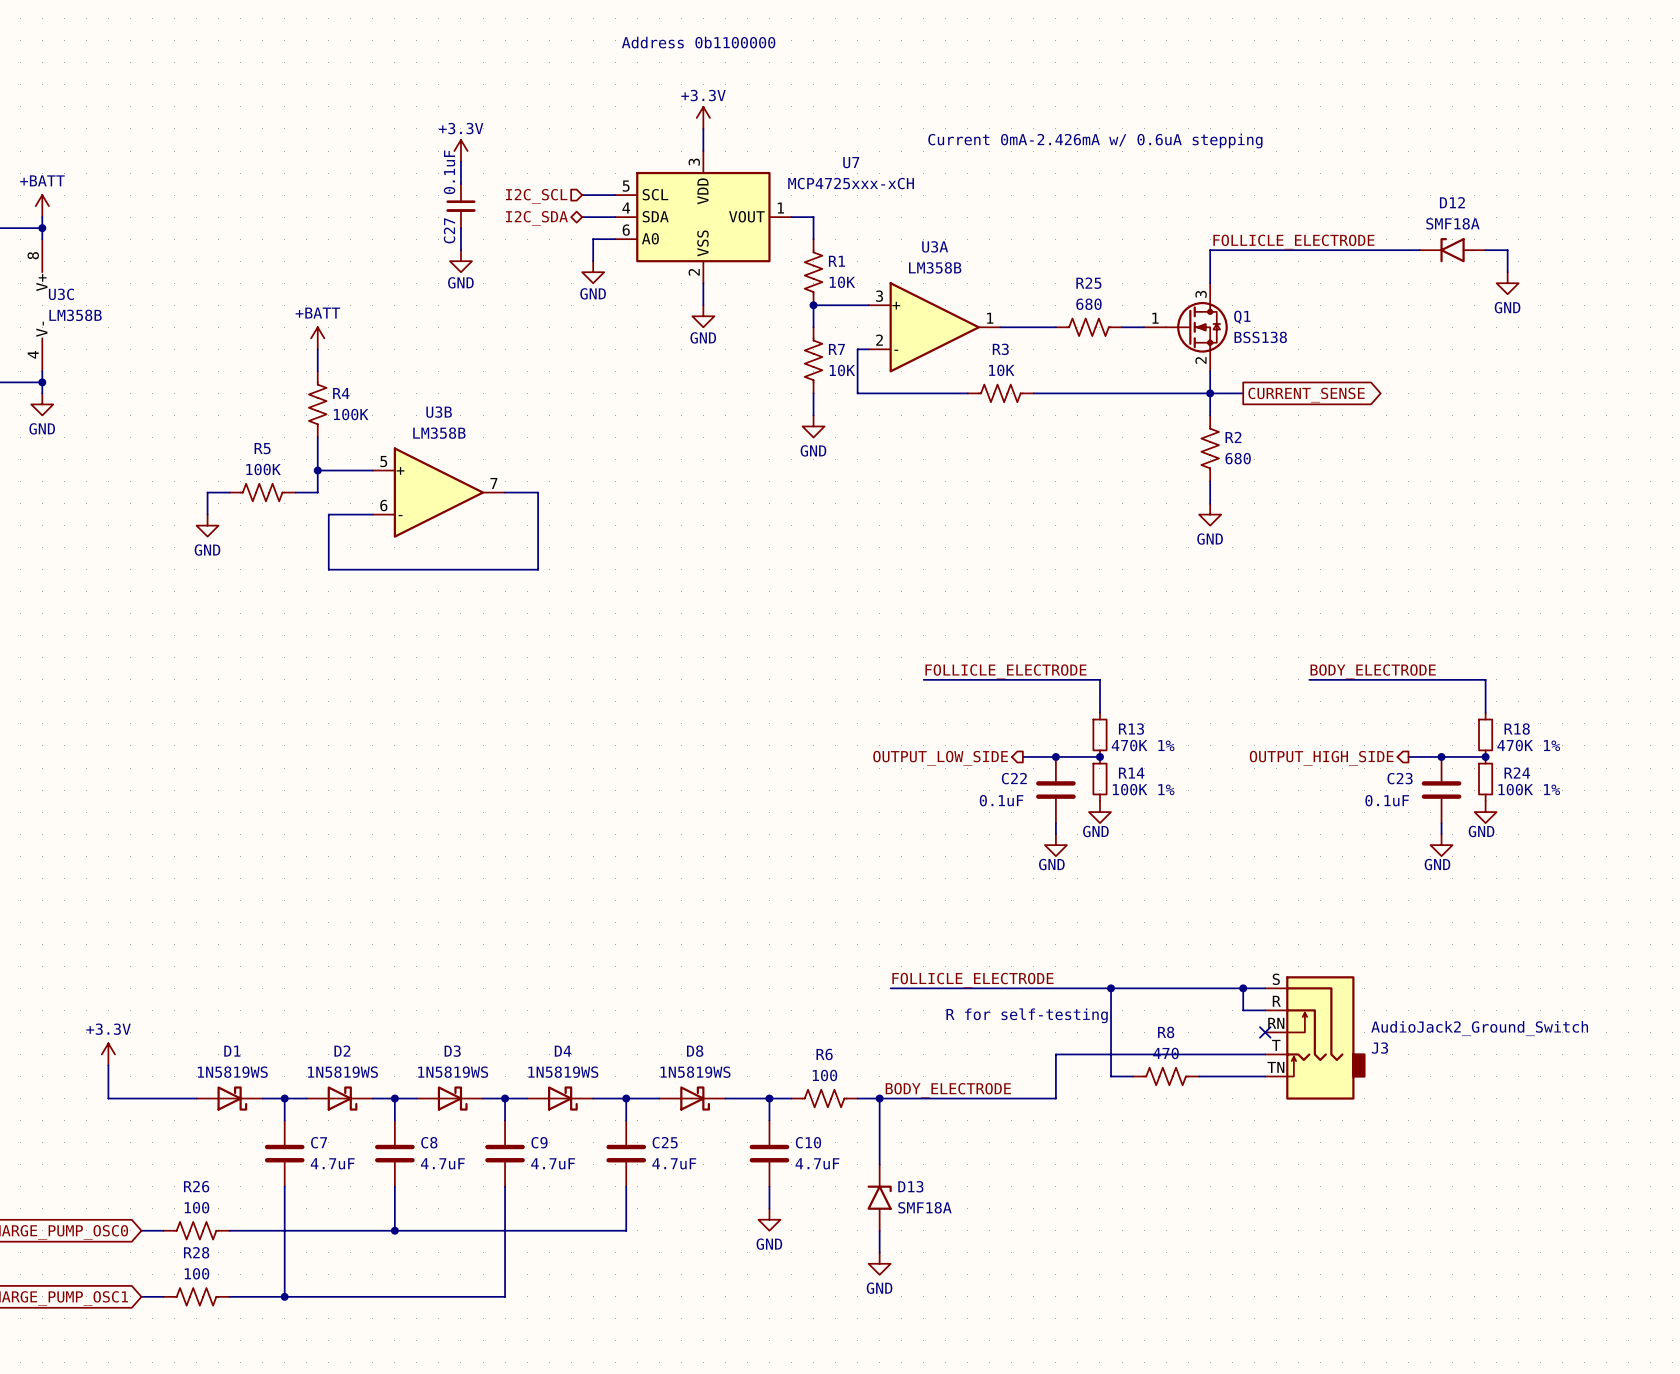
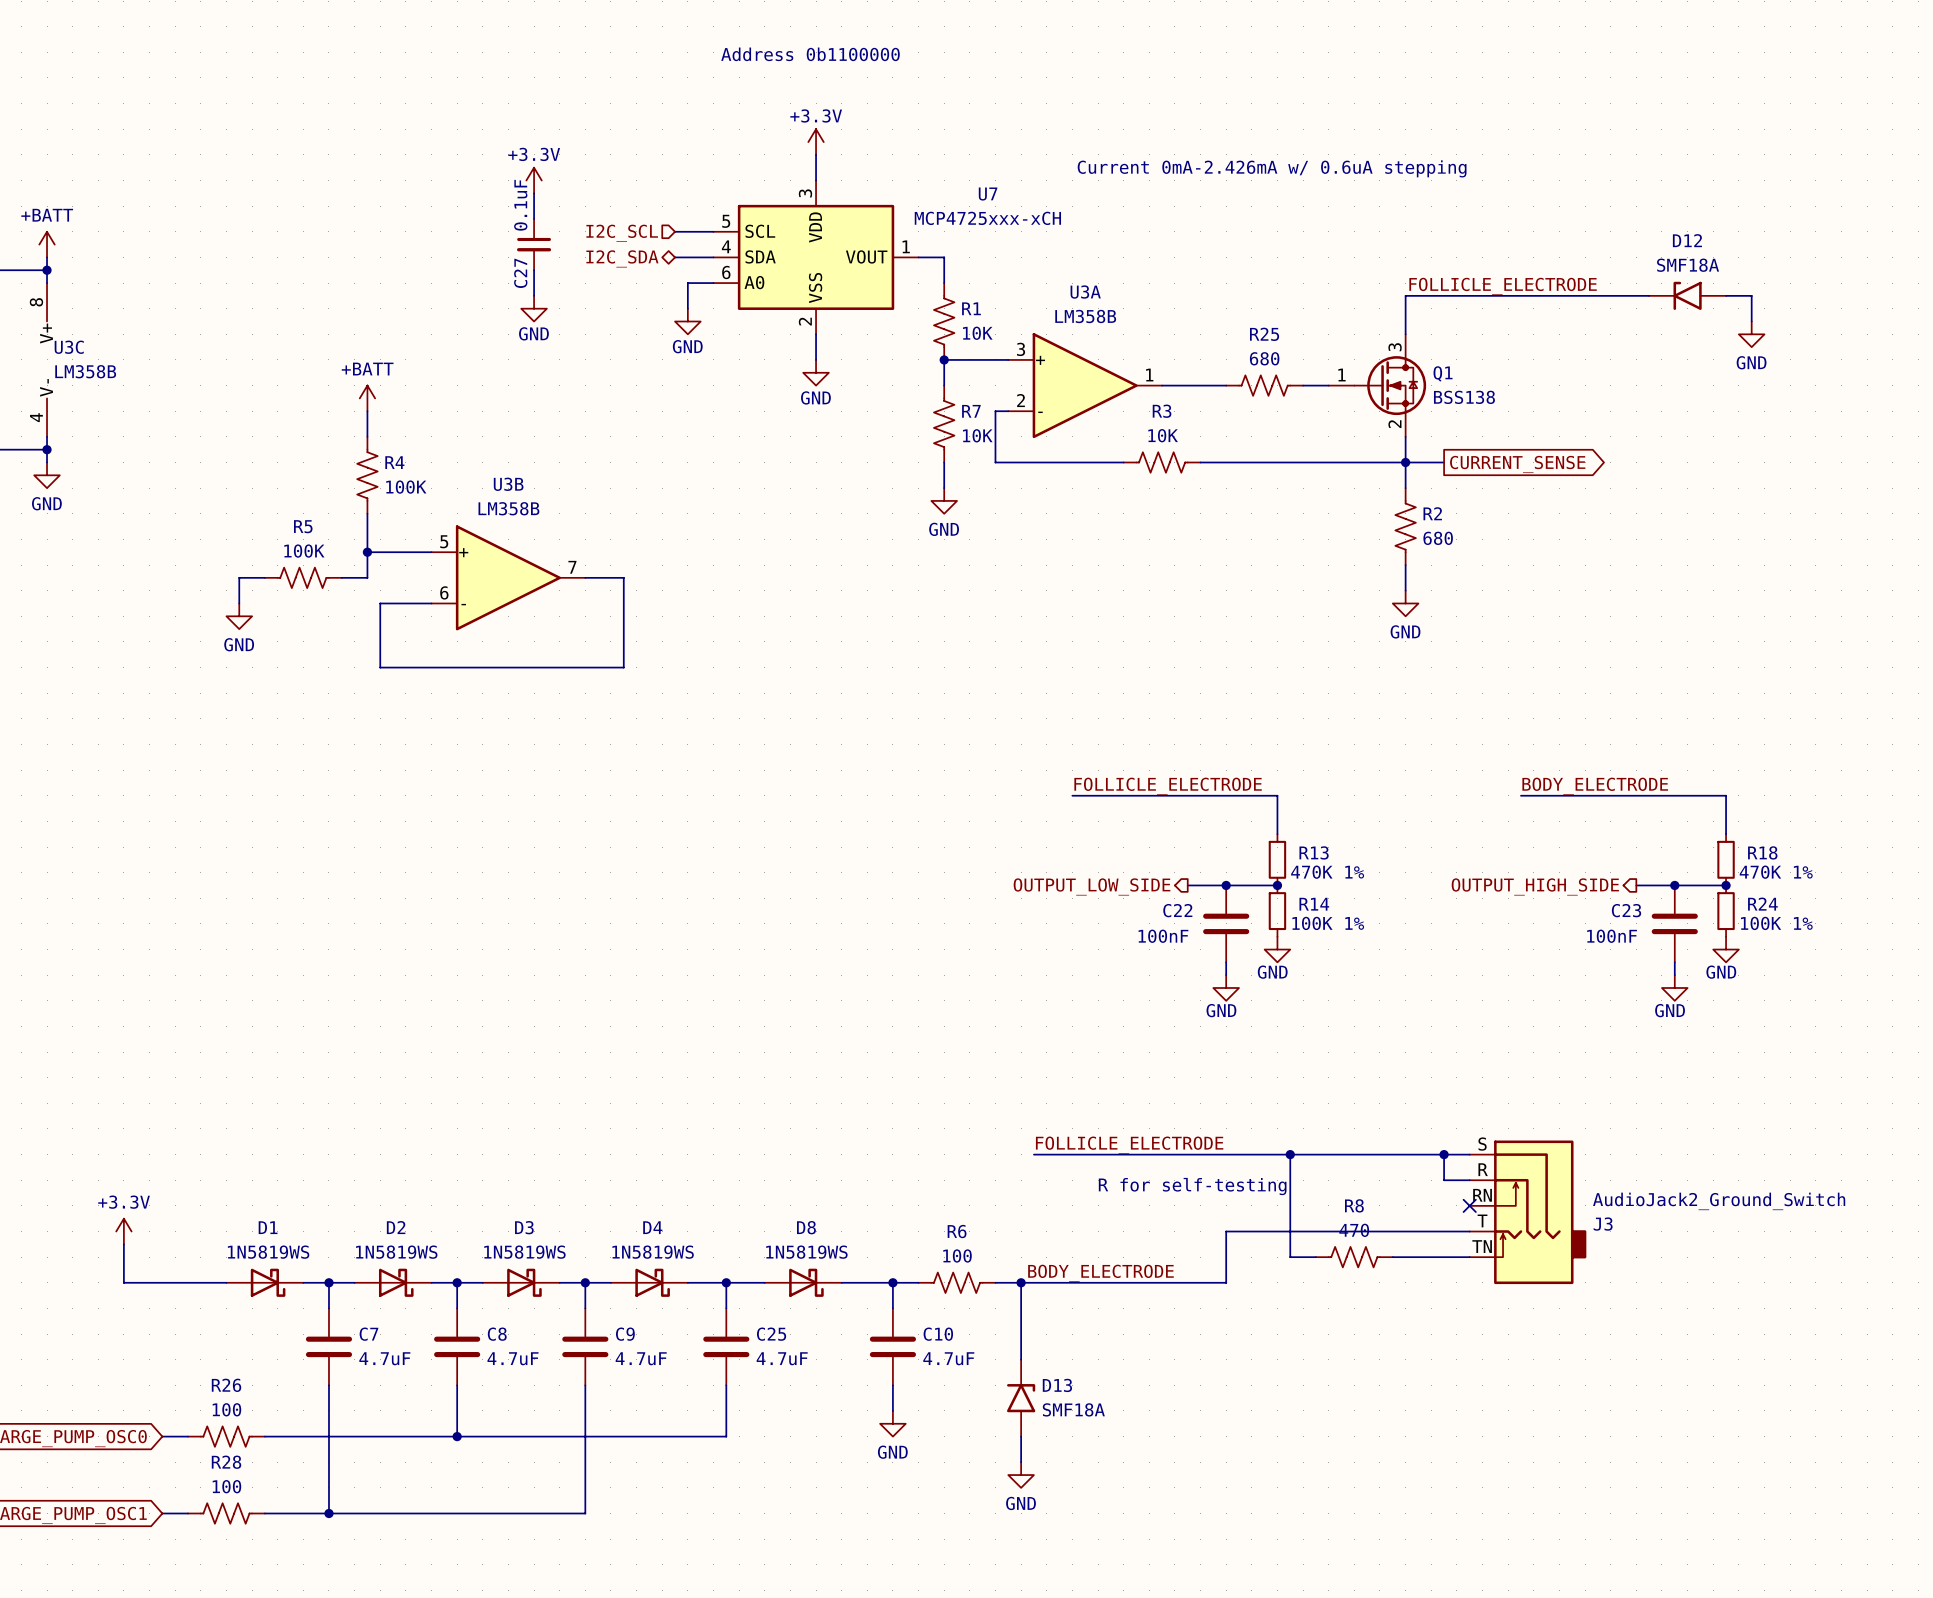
C22 value: 0.1uF (1001, 800) -> 100nF (1163, 936)
C23 value: 0.1uF (1387, 800) -> 100nF (1612, 936)

